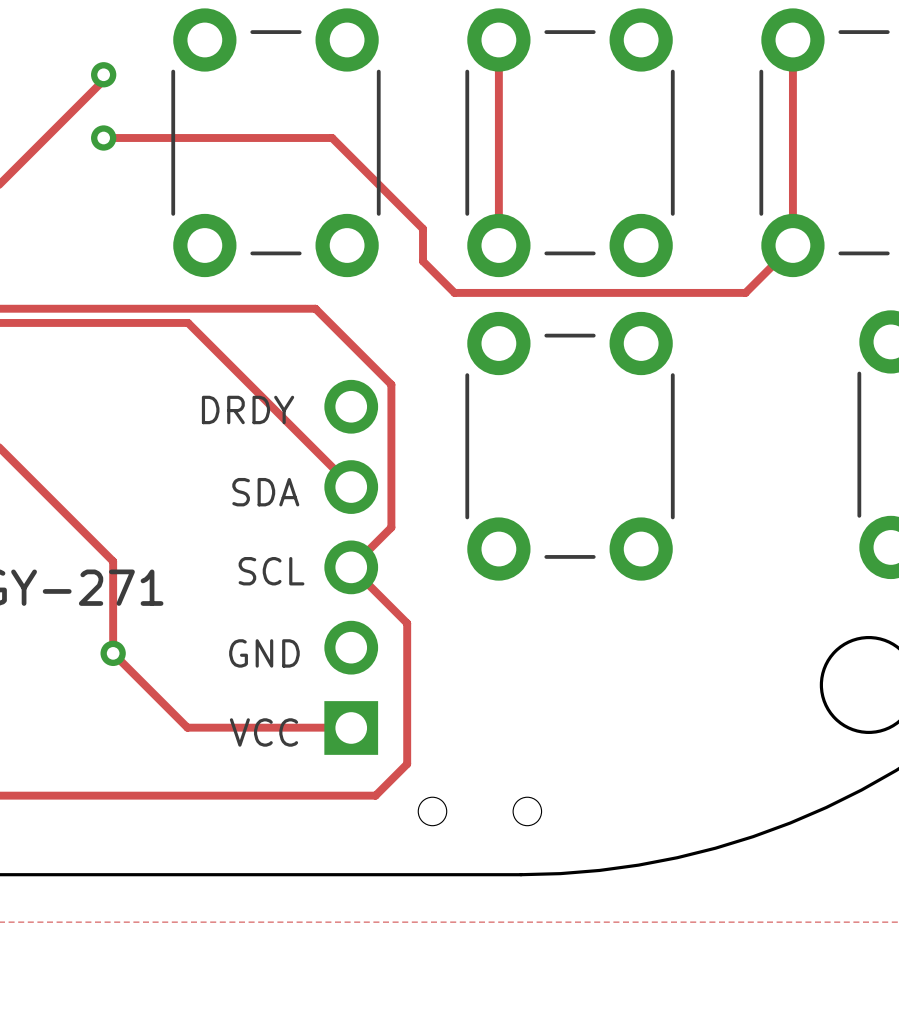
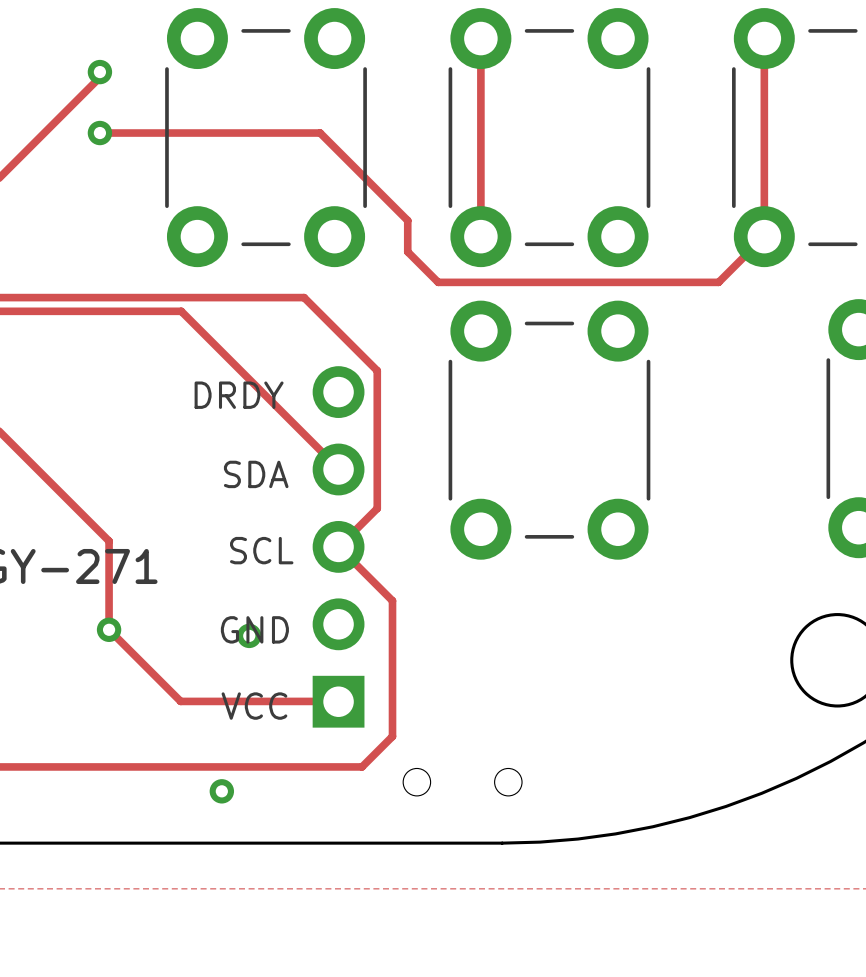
via: none -> (249, 635)
via: none -> (221, 791)

